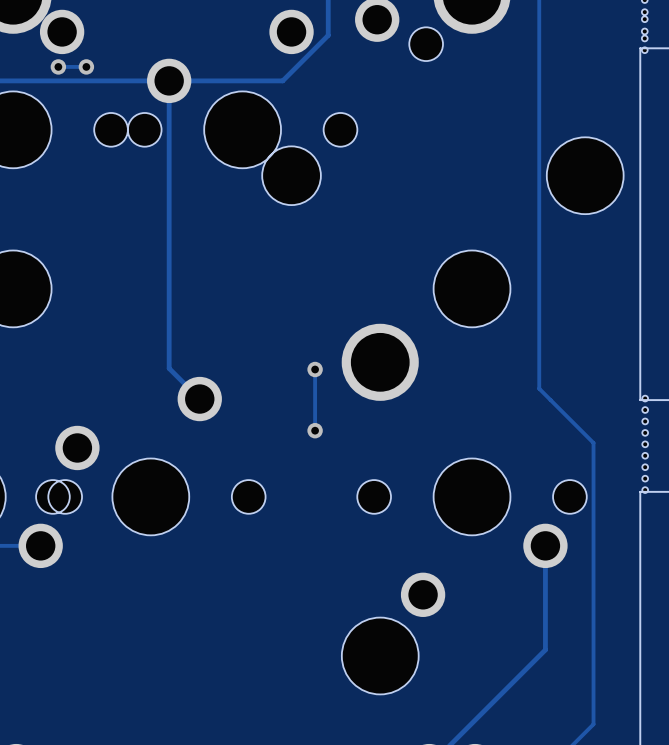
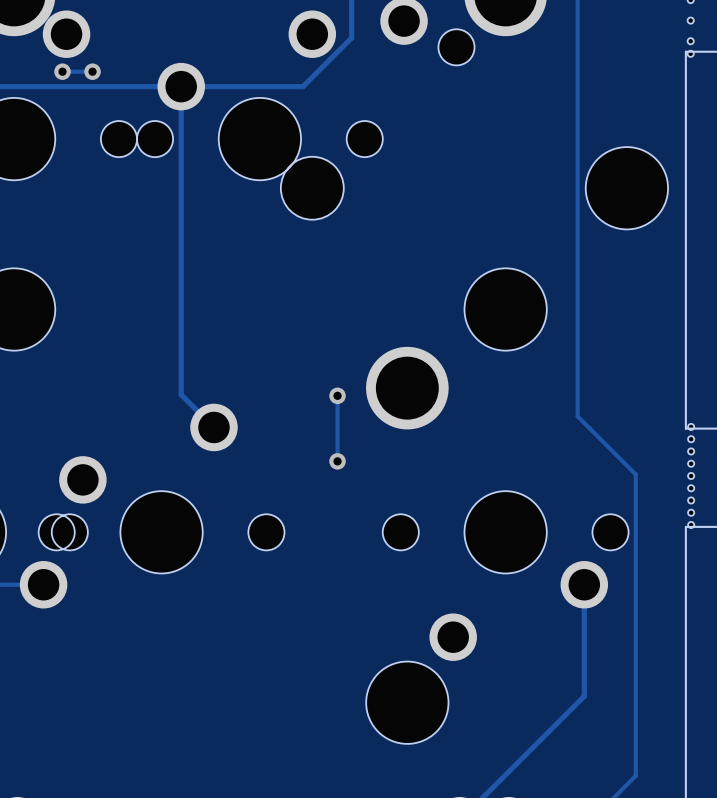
part: (644, 12) -> none
part: (644, 31) -> none

